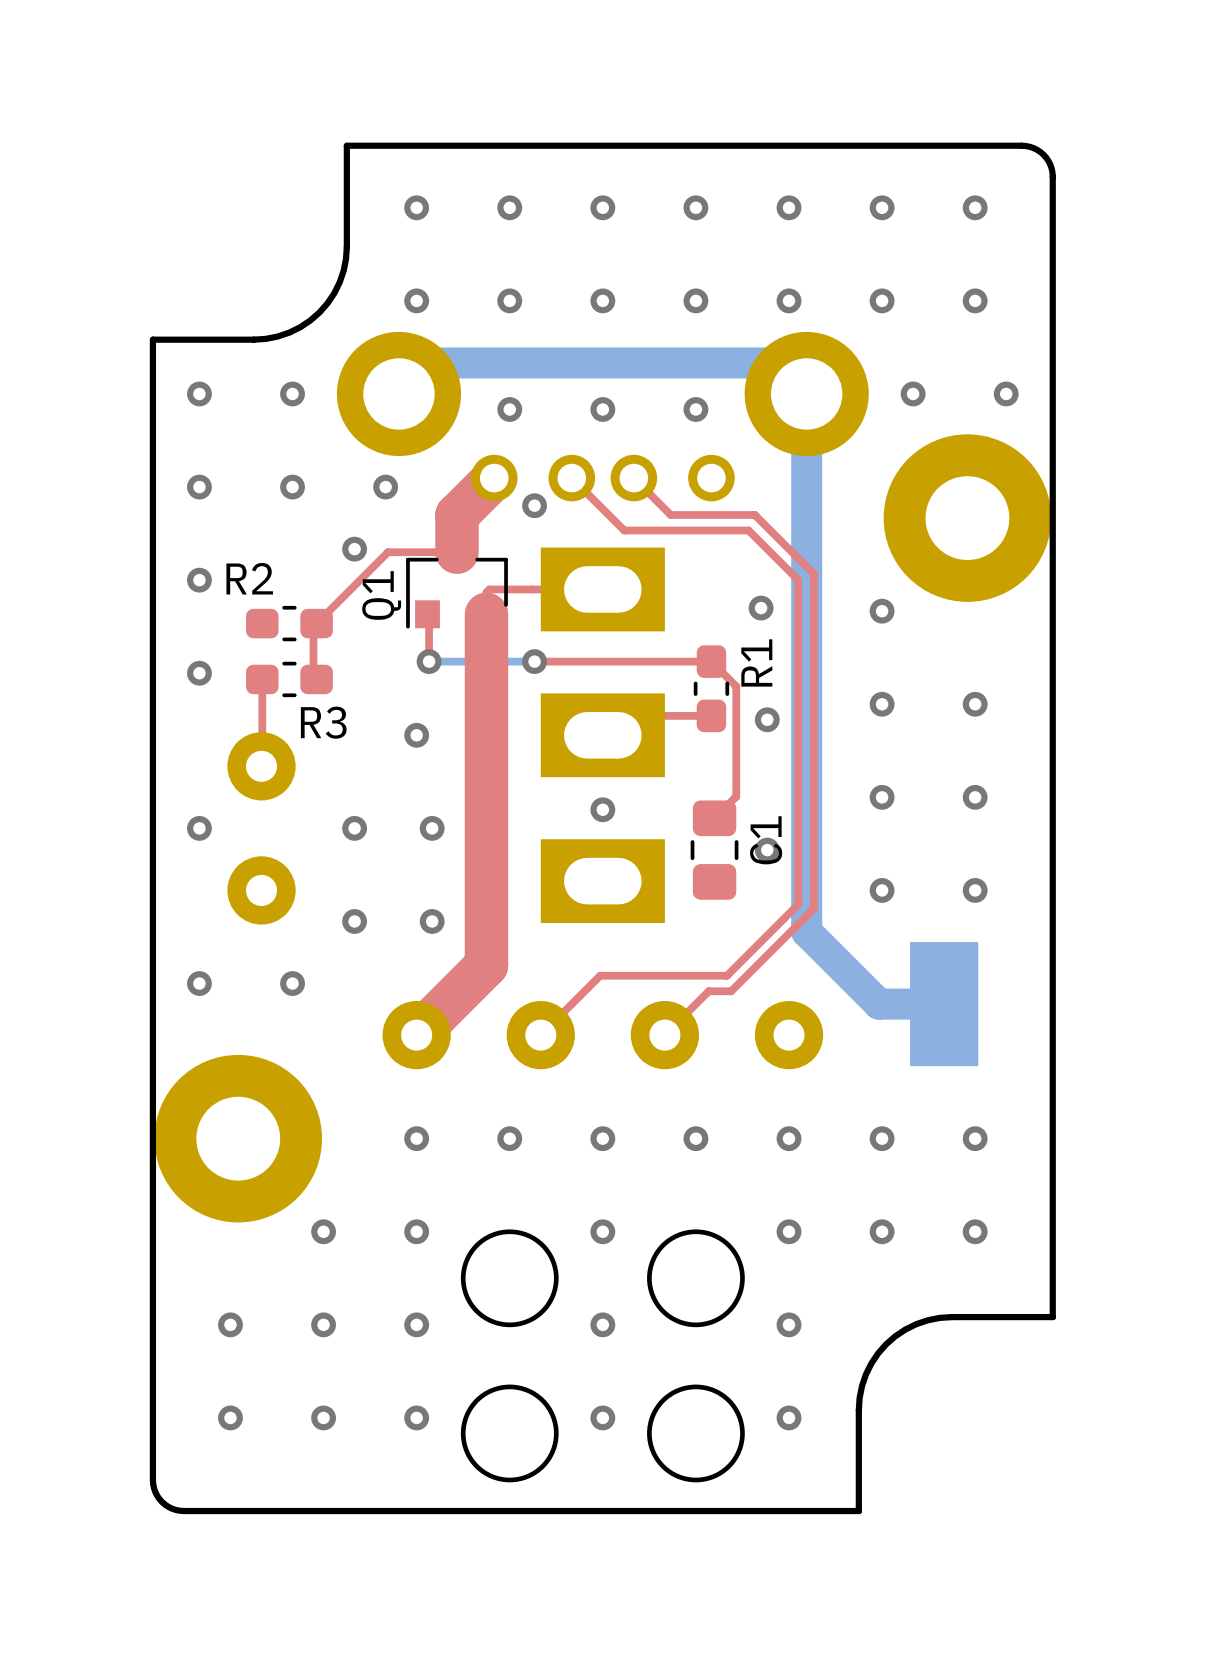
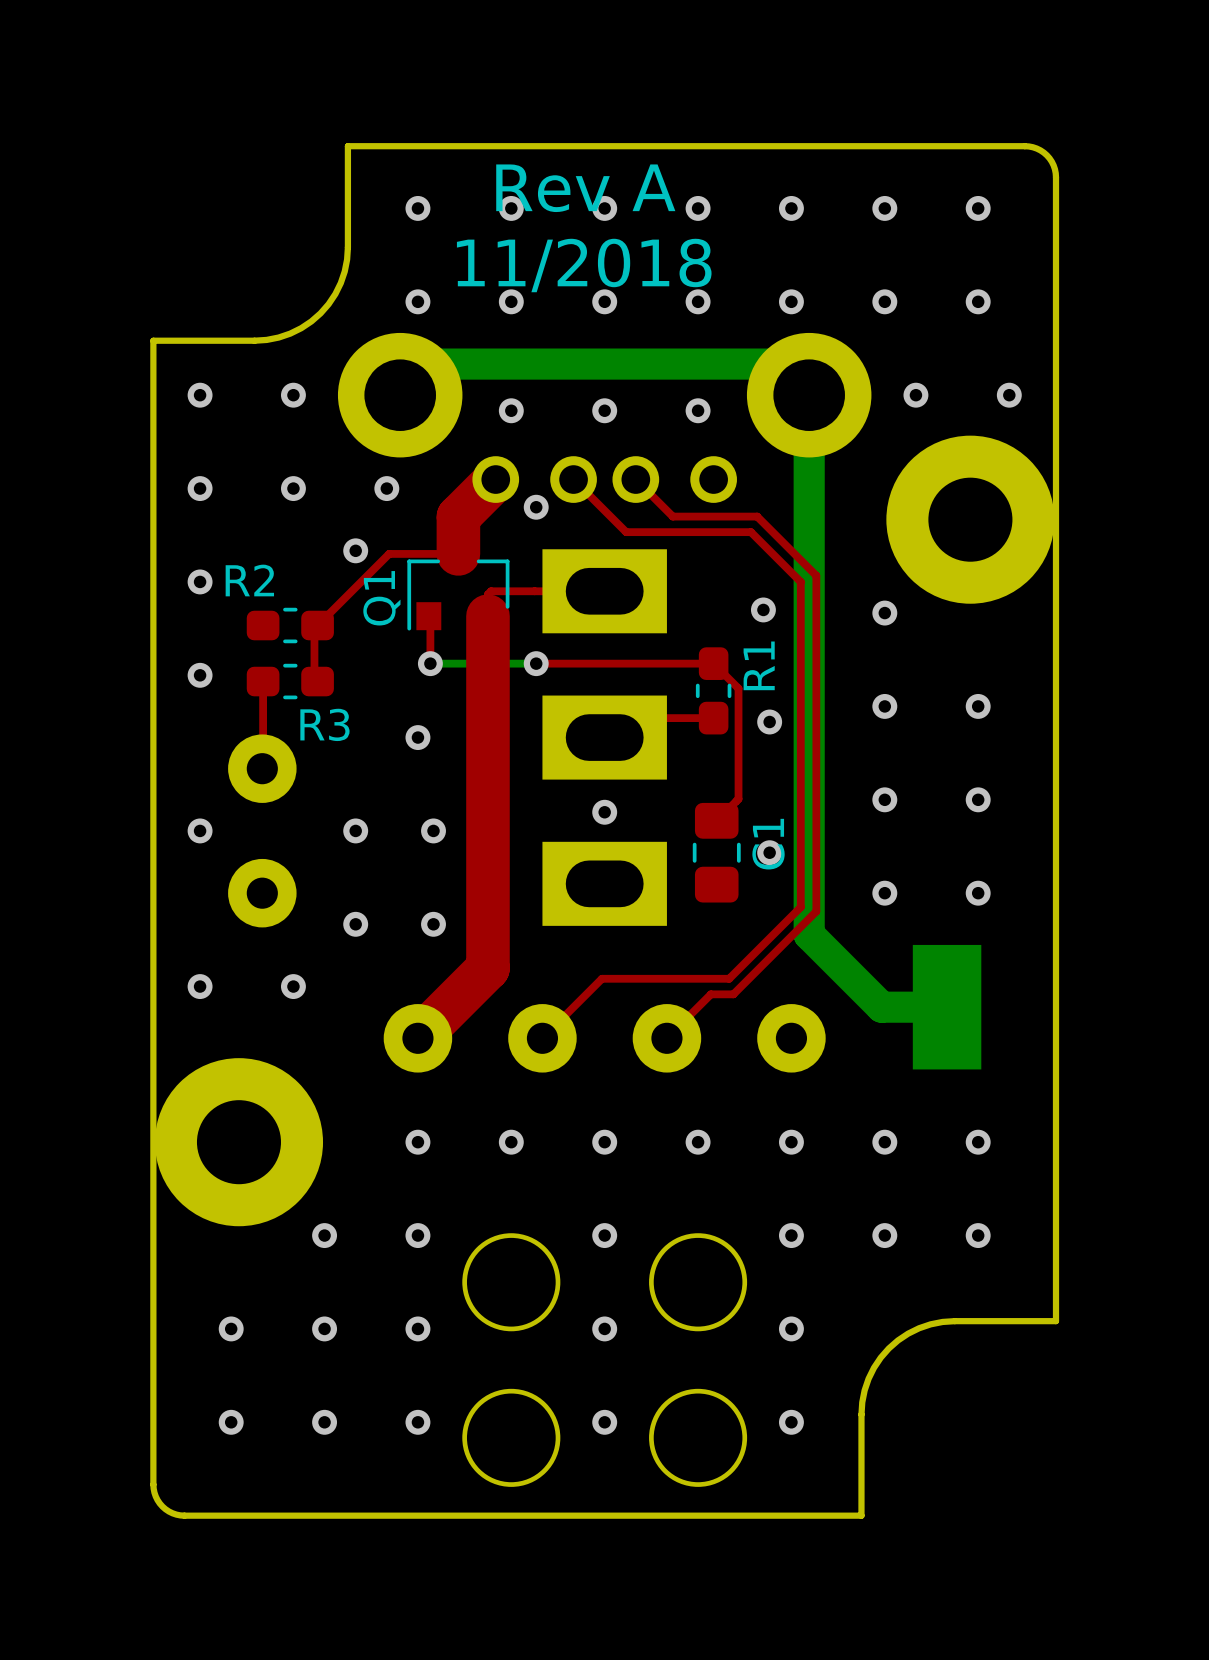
text: none -> Rev A (585, 188)
text: none -> 11/2018 (584, 265)

